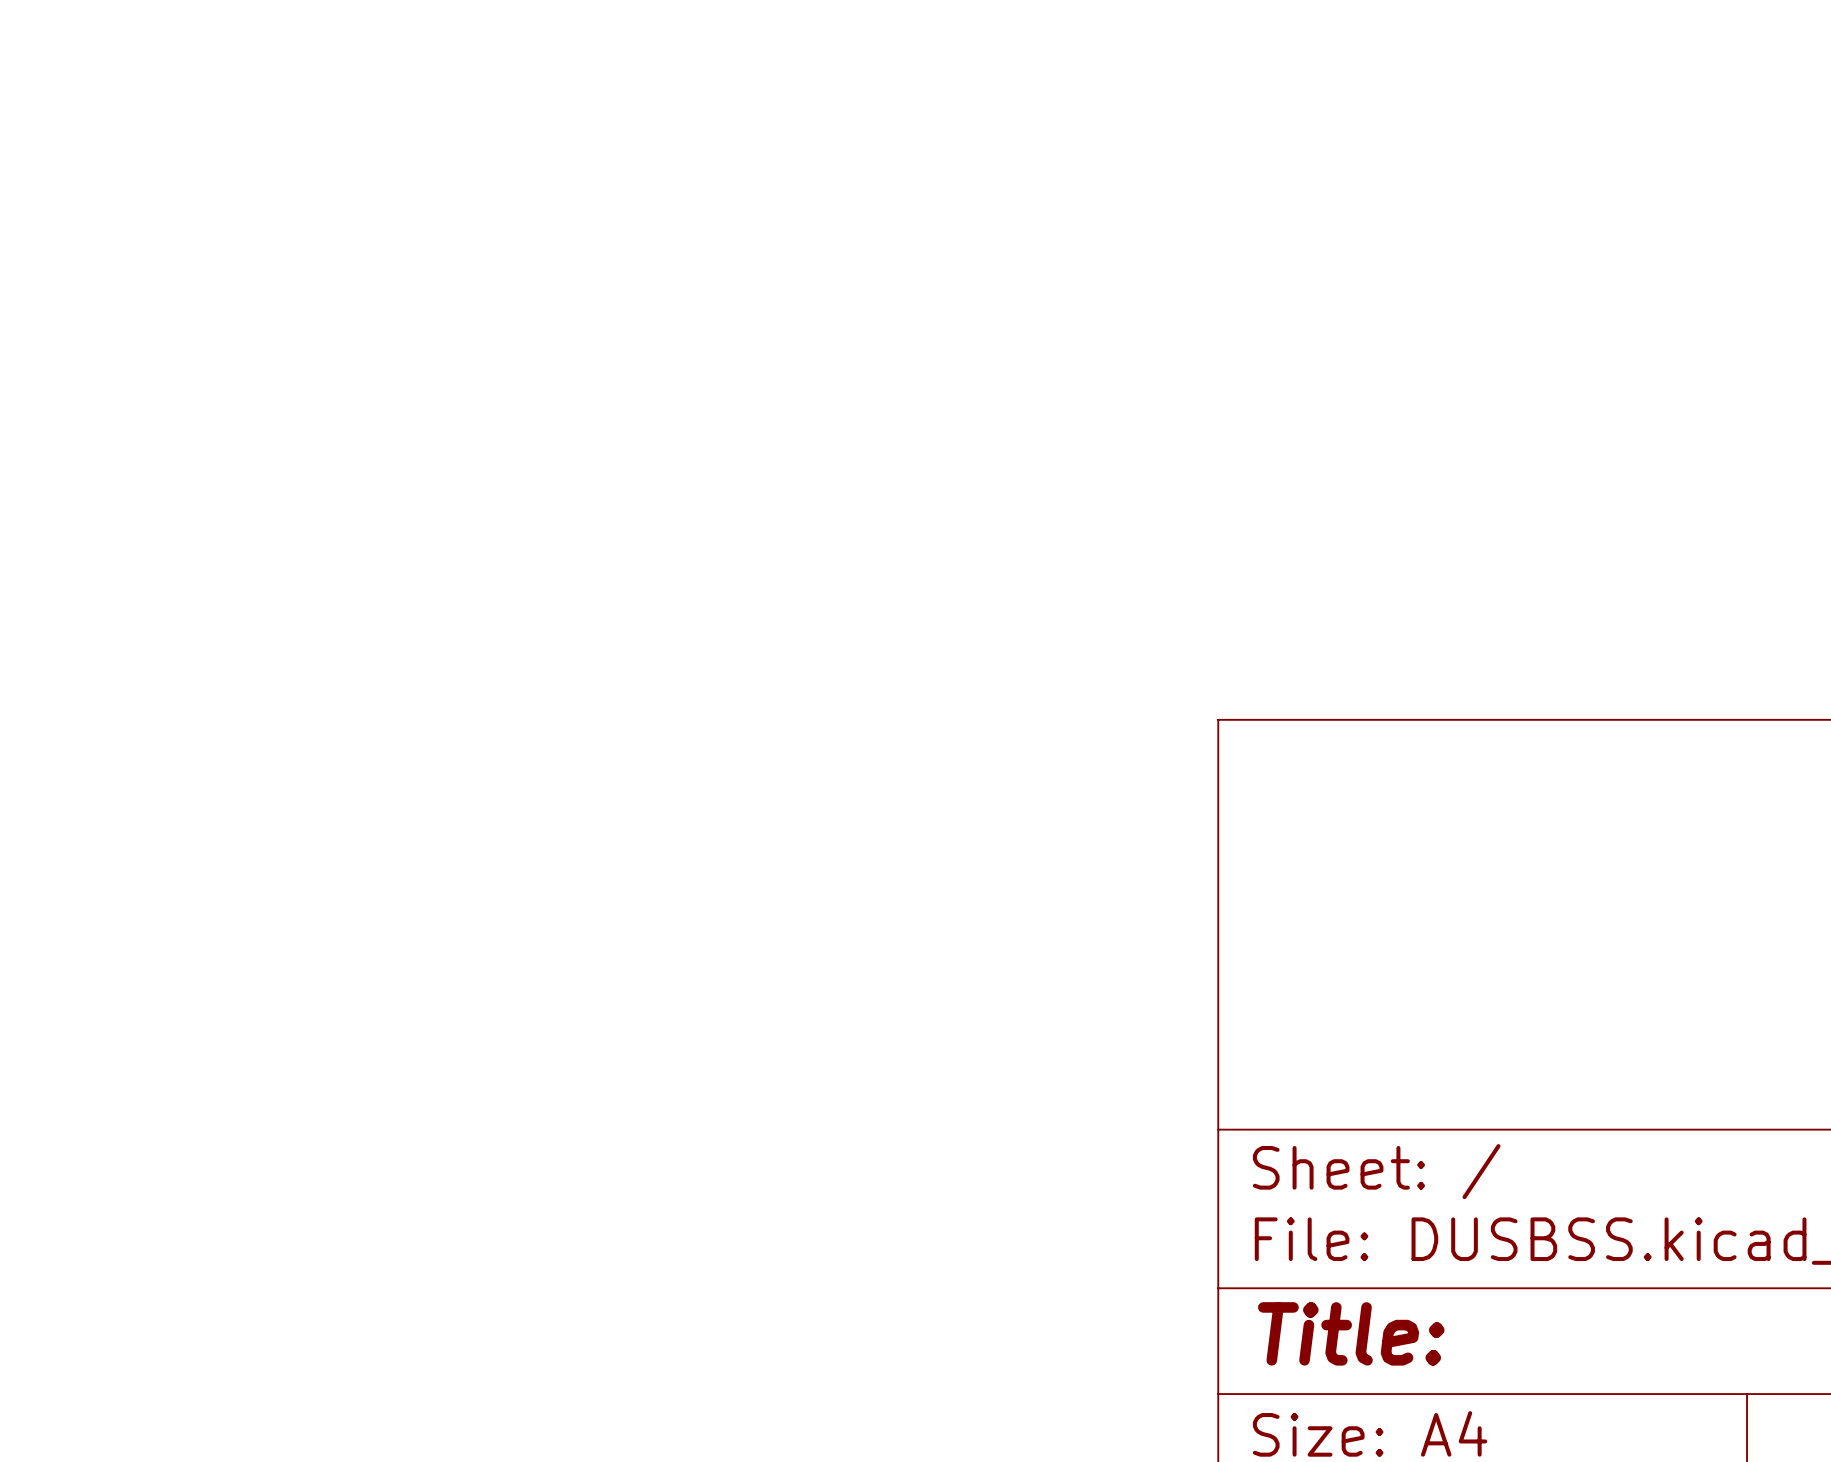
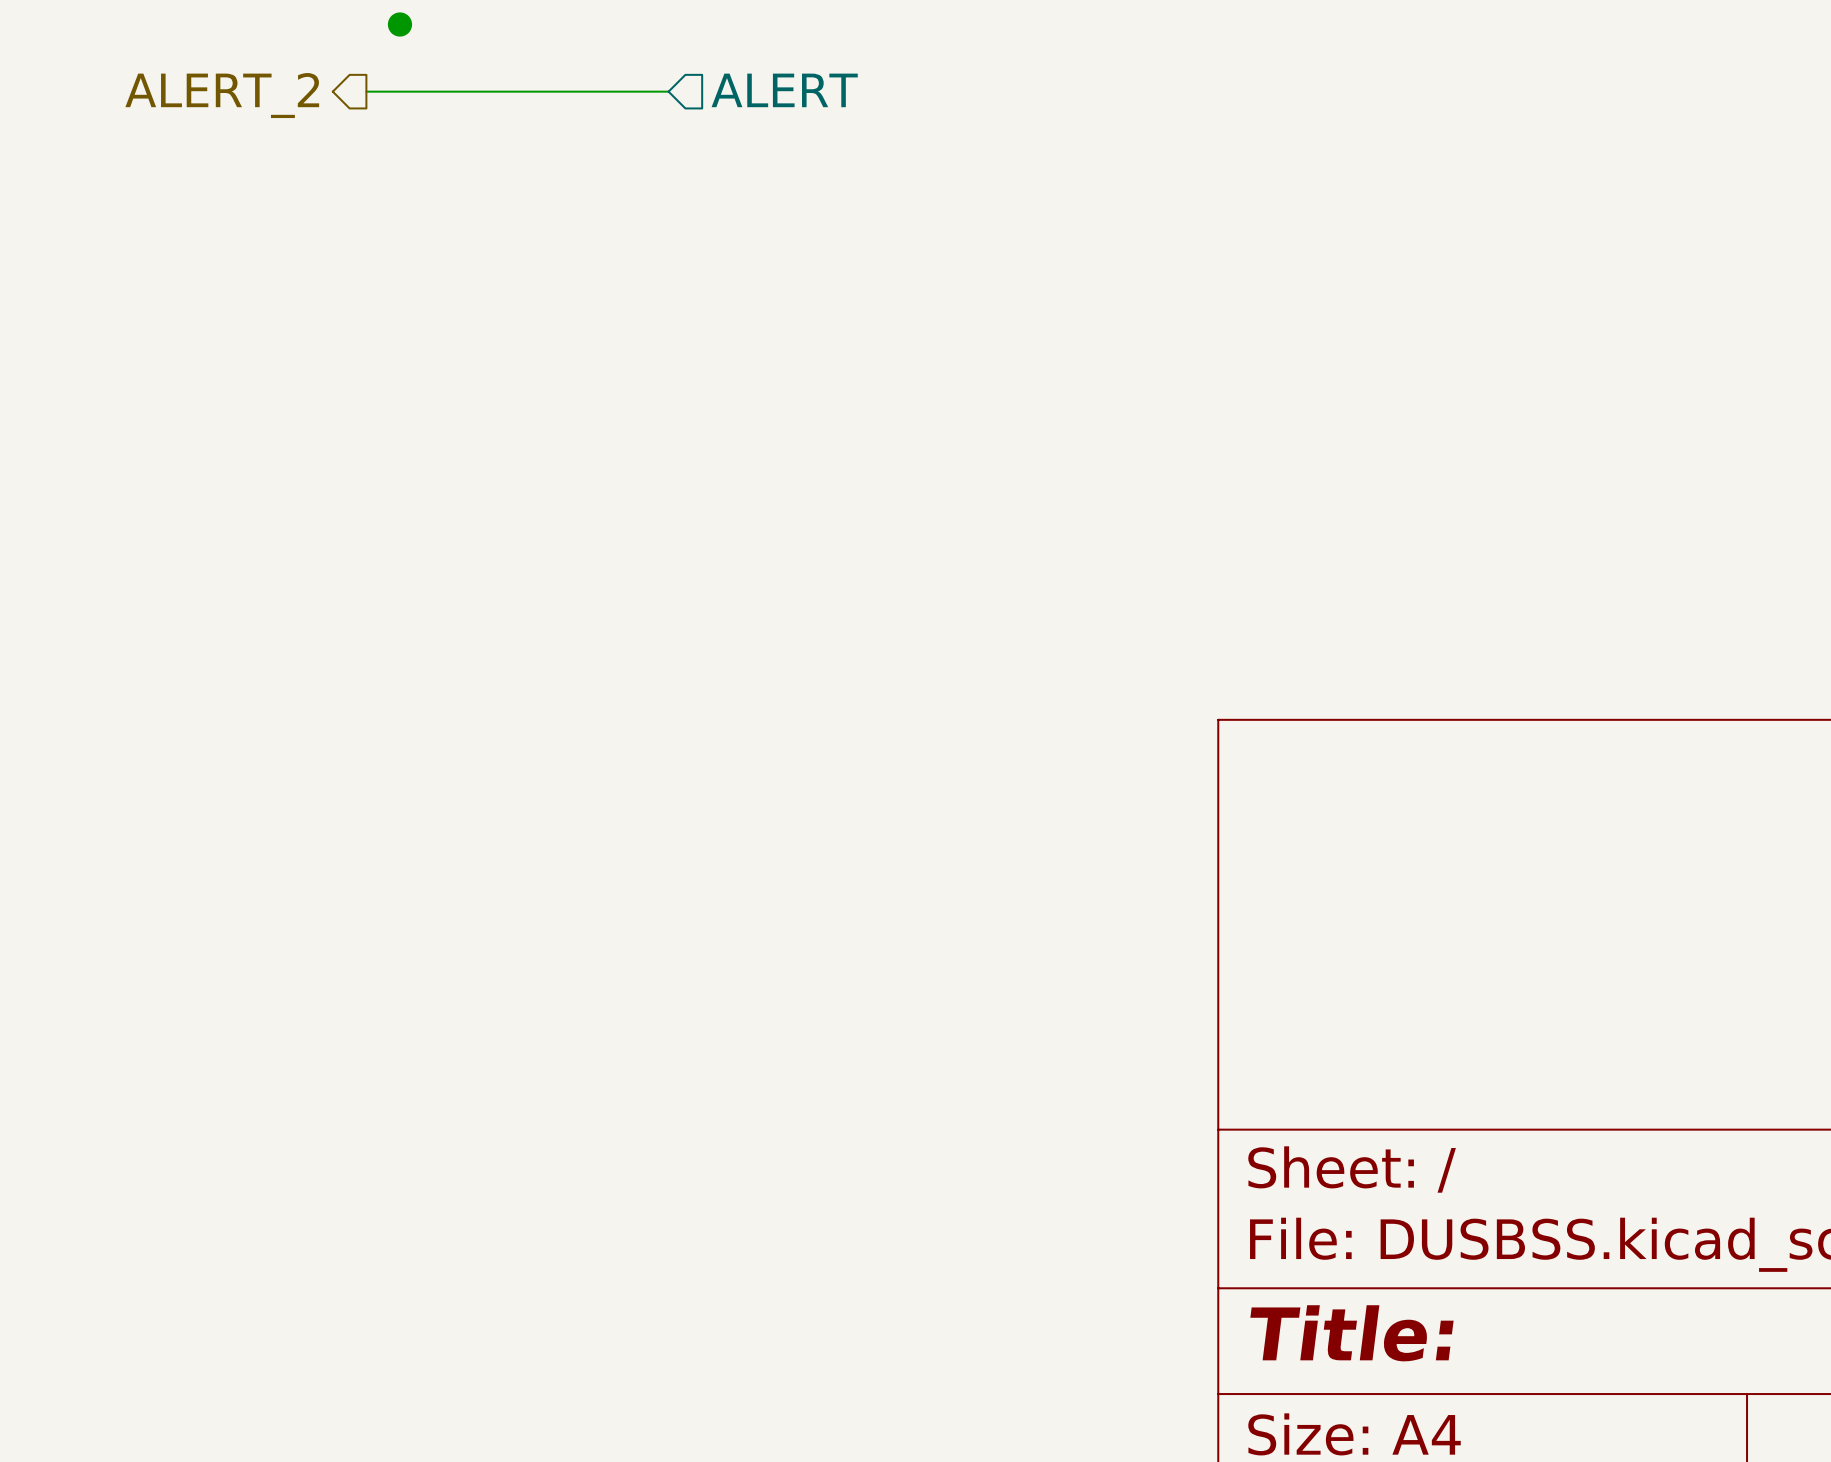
junction: none -> (399, 24)
sheet pin: none -> ALERT (784, 90)
hierarchical label: none -> ALERT_2 (222, 95)
wire: none -> (366, 91) (668, 91)

